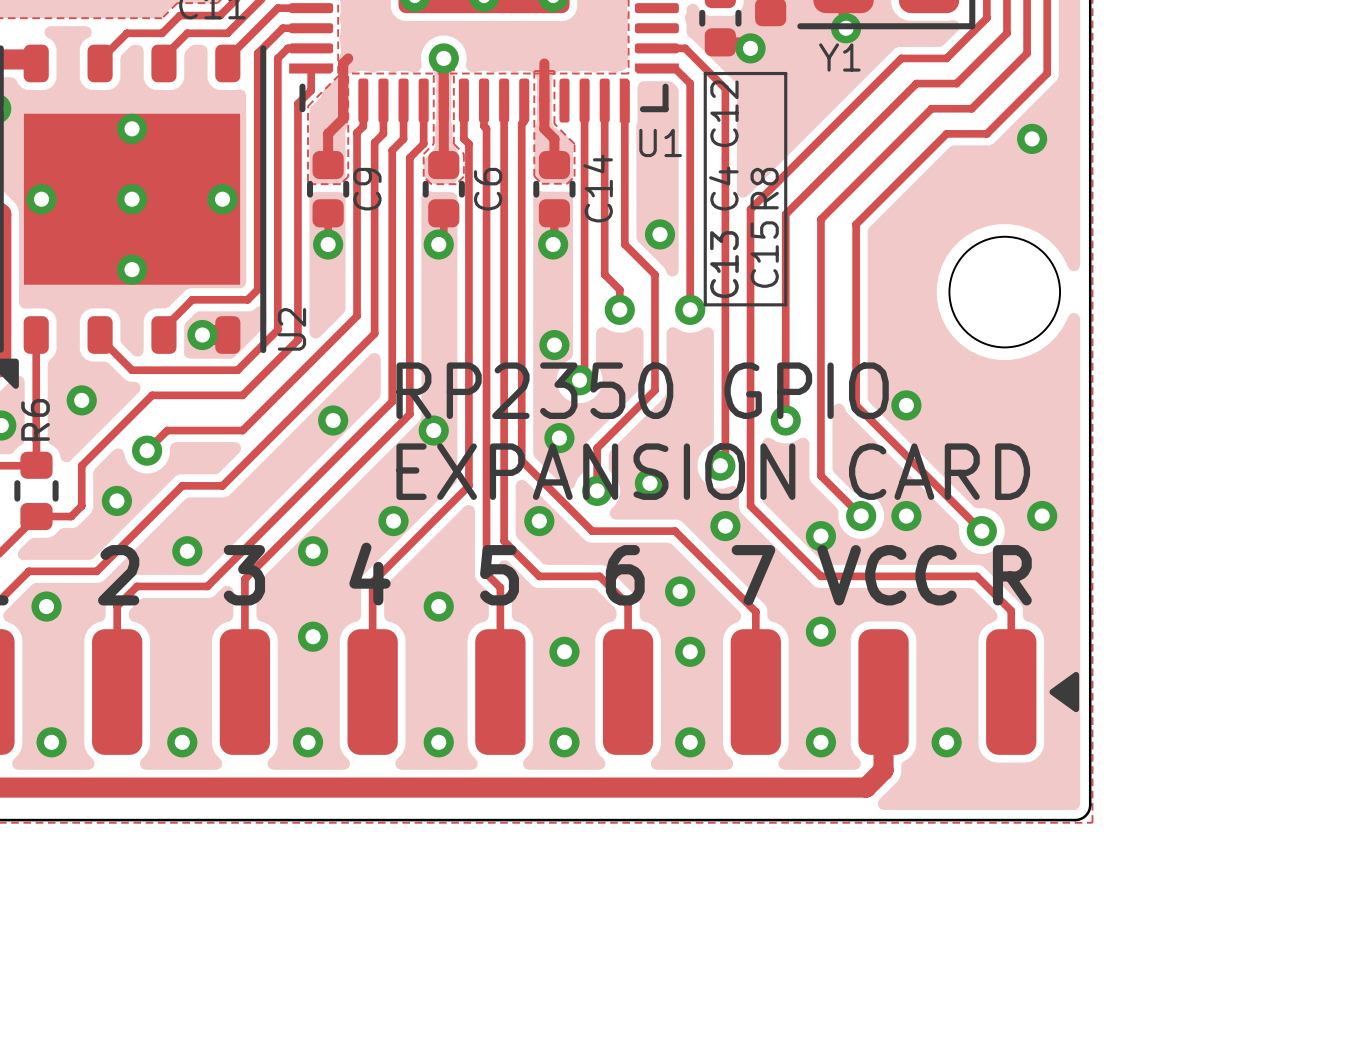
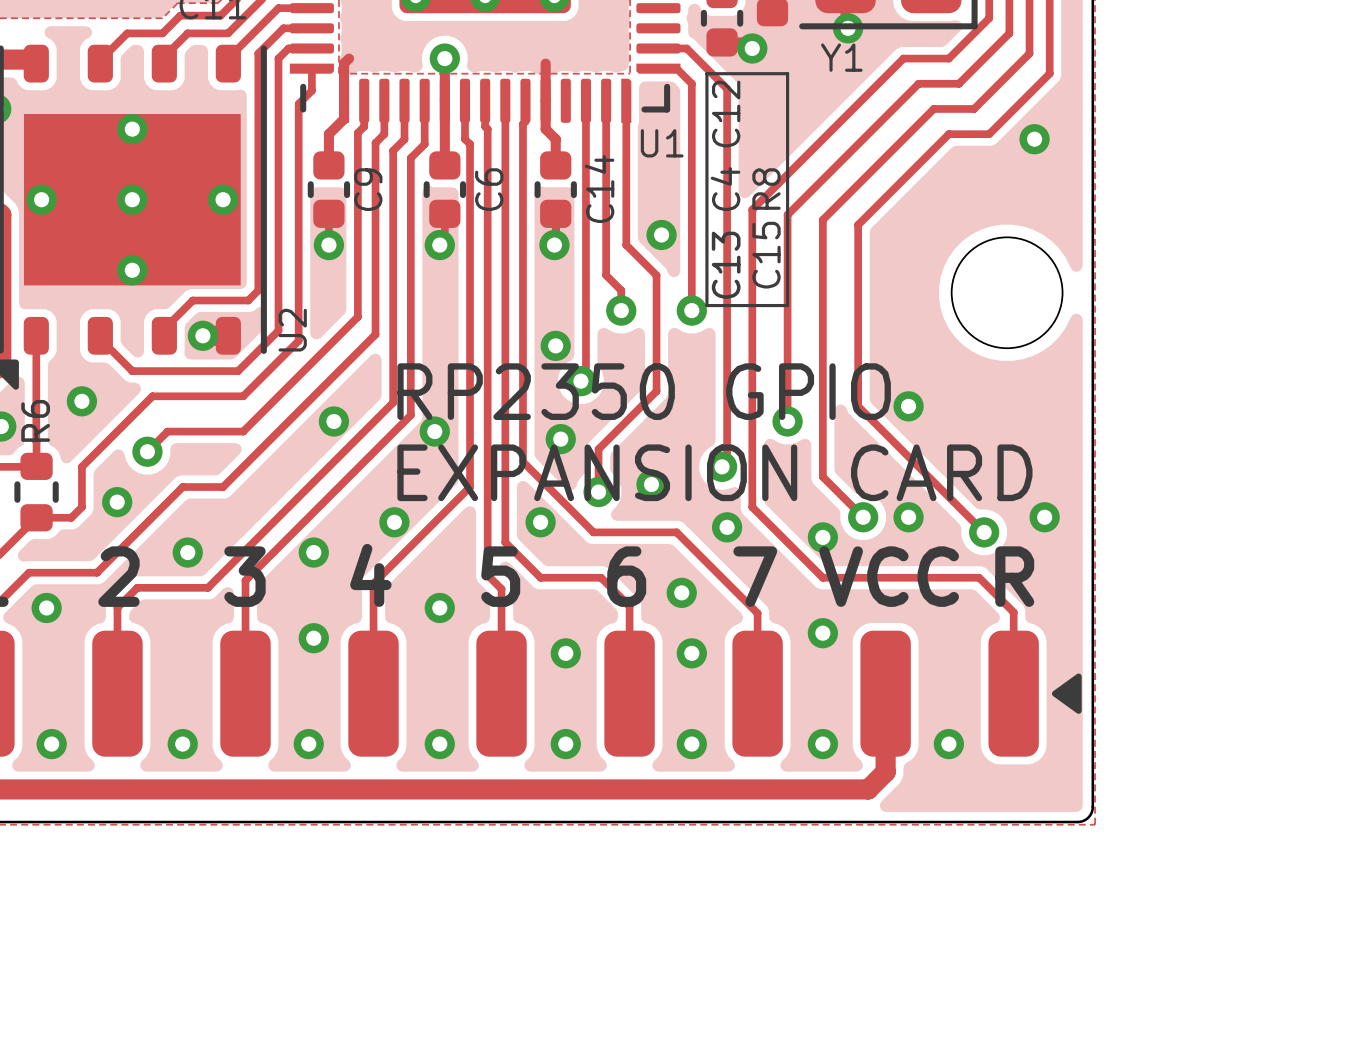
zone outline: (433, 63) (433, 143) (423, 153) (423, 176) (431, 184) (456, 184) (463, 176) (463, 153) (453, 143) (453, 63) (433, 63) -> none
zone outline: (534, 71) (534, 176) (541, 183) (567, 183) (574, 176) (574, 143) (554, 123) (554, 71) (534, 71) -> none
zone outline: (338, 76) (348, 76) (348, 176) (340, 184) (310, 184) (308, 181) (308, 106) (338, 76) -> none

